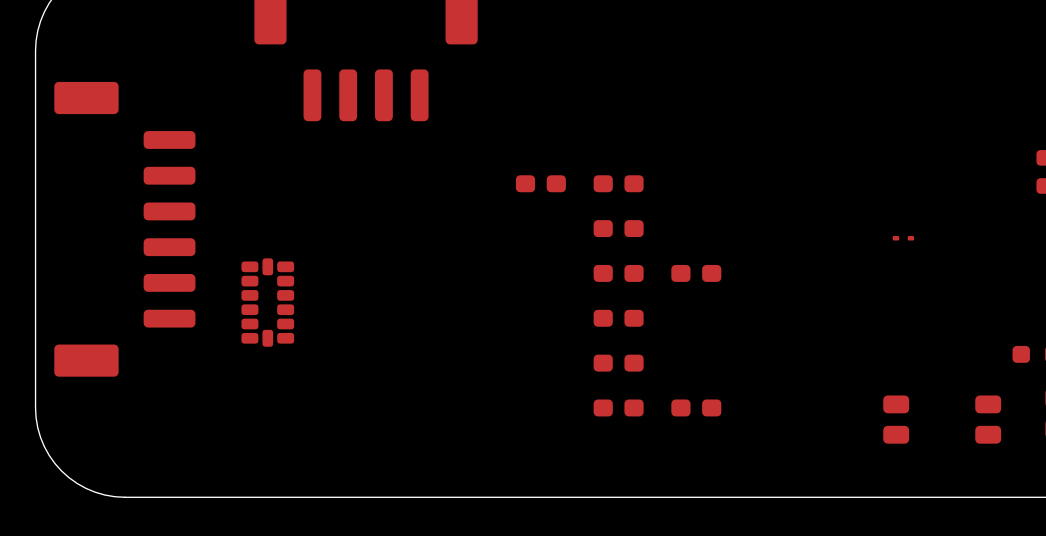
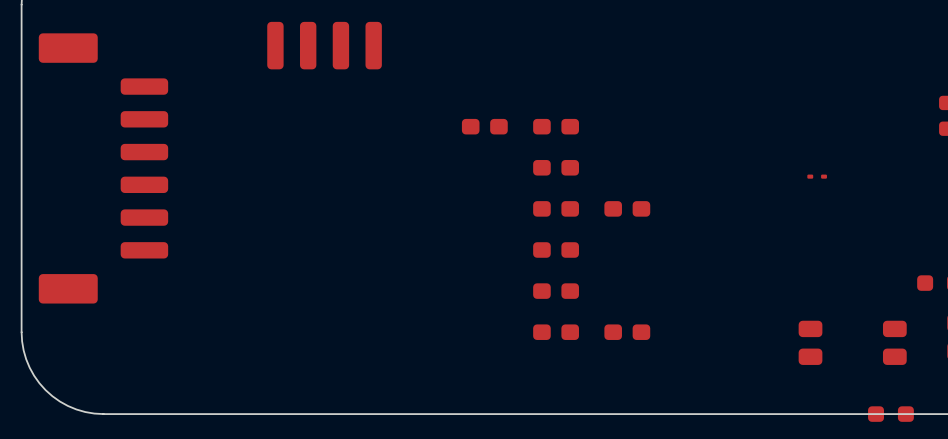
part: (267, 302) -> none
part: none -> (890, 414)

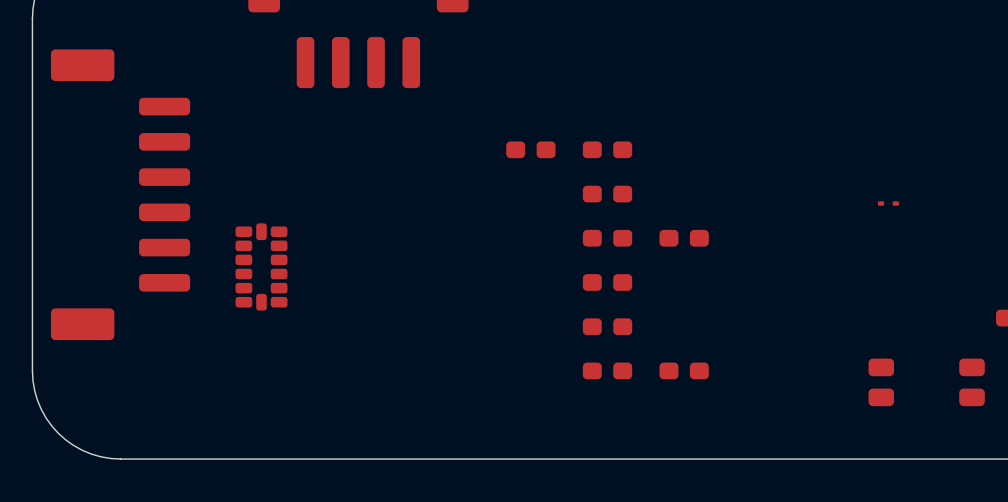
part: none -> (261, 266)
part: (890, 414) -> none

